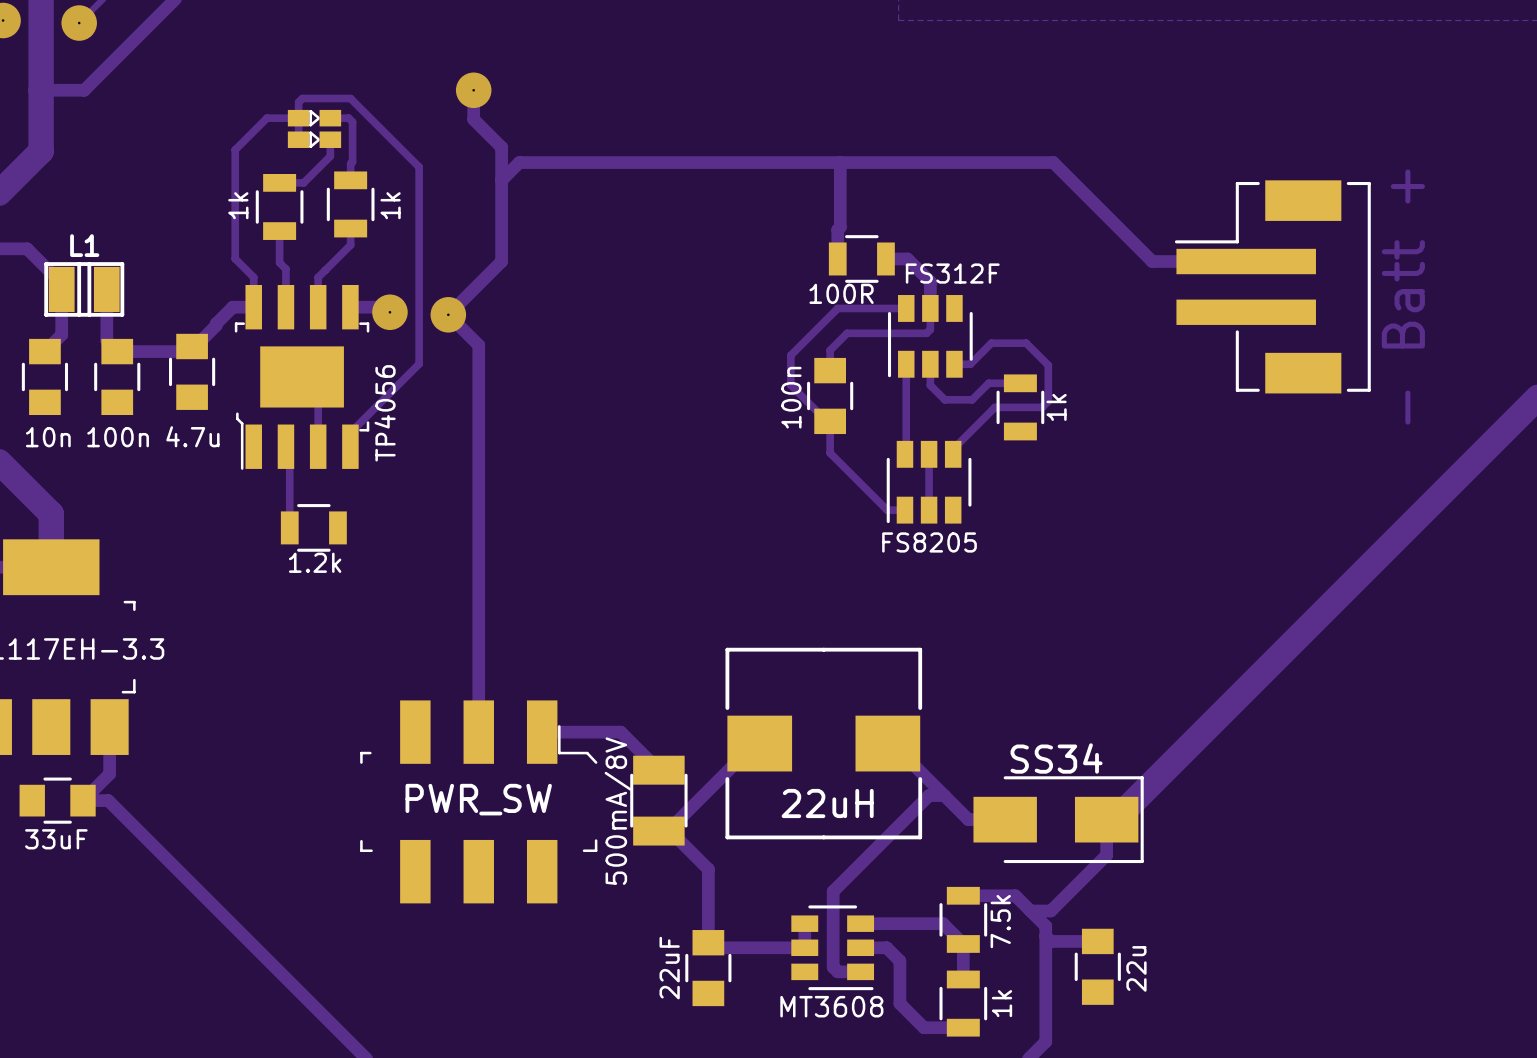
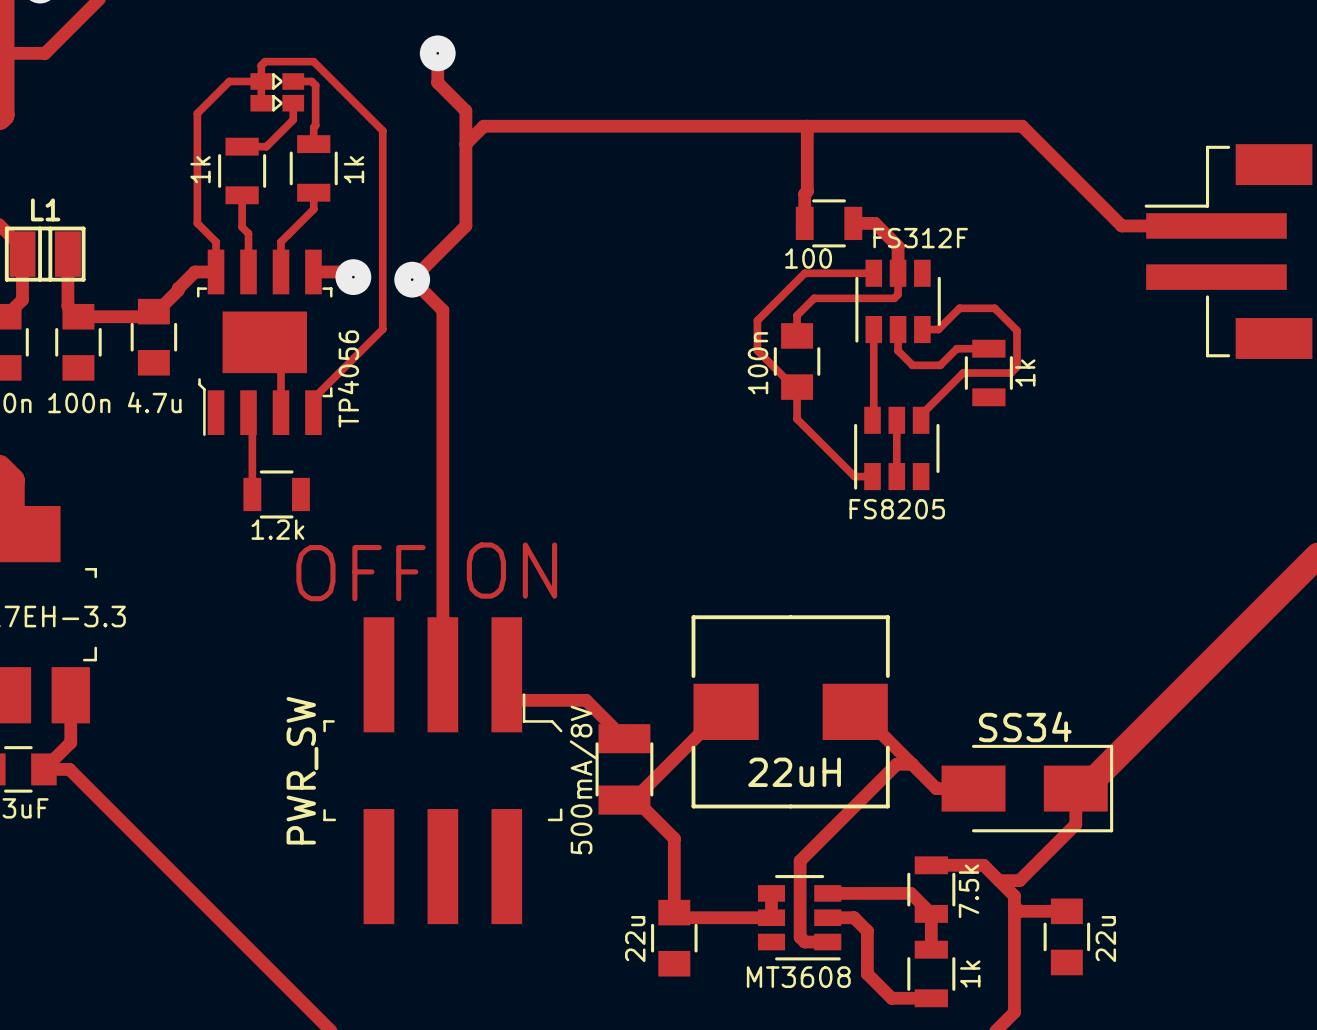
part value: 100R (841, 293) -> 100 (808, 258)
text: none -> ON (511, 570)
text: none -> OFF (360, 573)
part footprint: [360, 700, 598, 904] -> [323, 617, 563, 925]
part value position: PWR_SW (478, 799) -> PWR_SW (302, 770)
part value: 22uF (669, 968) -> 22u (635, 939)

